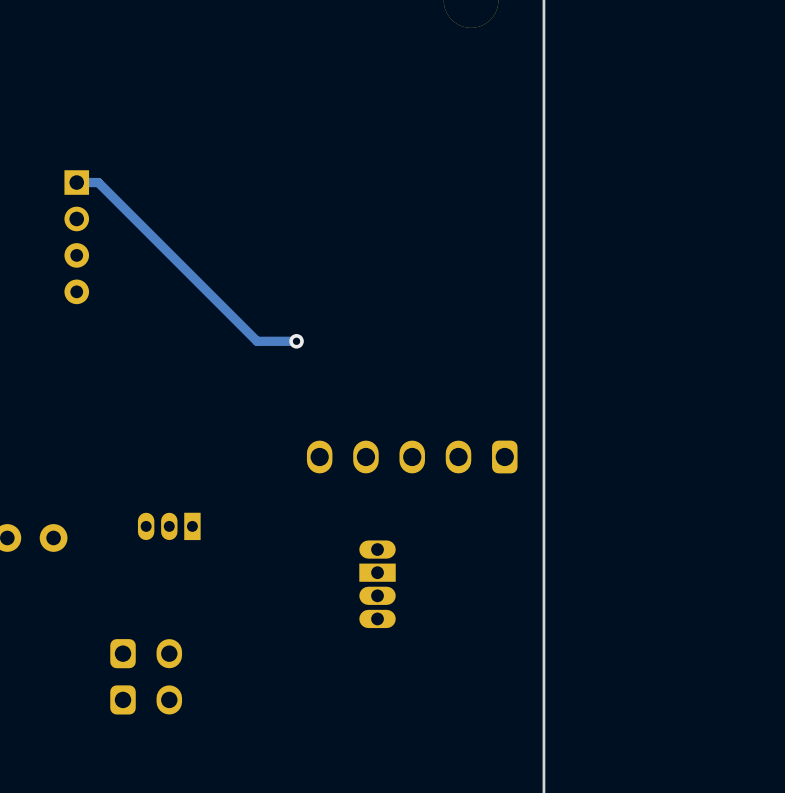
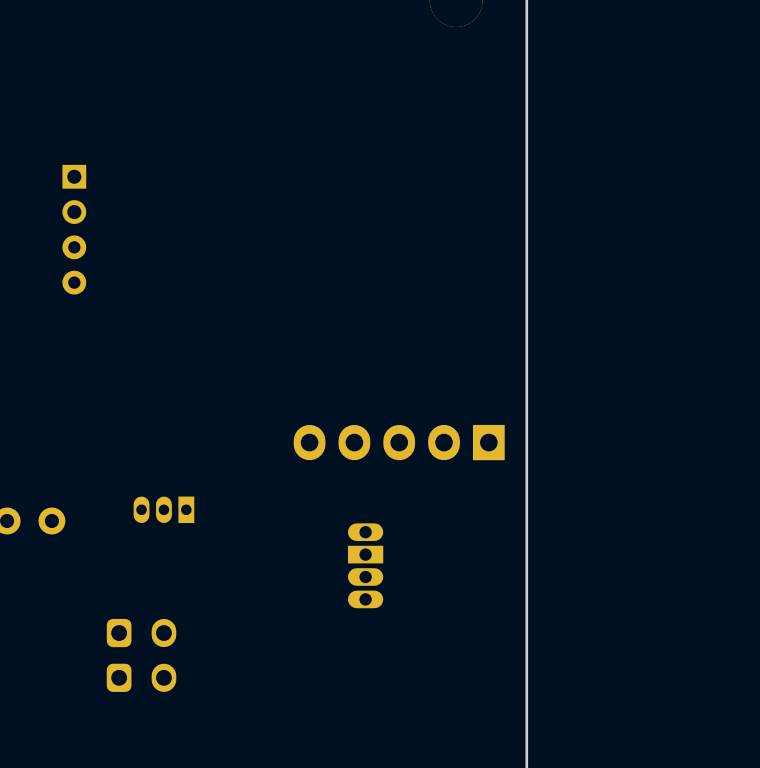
track: (76, 182) (98, 182) (257, 341) (296, 341) -> none
via: (296, 341) -> none
part footprint: [306, 440, 518, 474] -> [293, 424, 505, 461]

